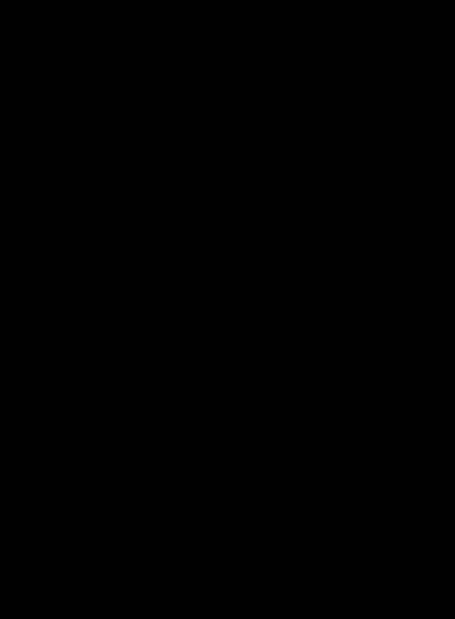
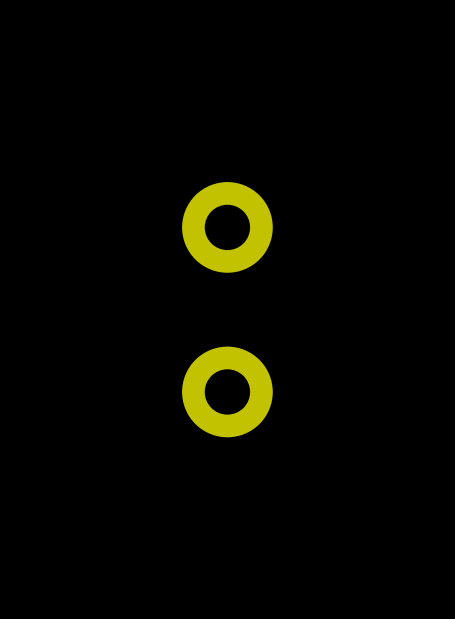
part: none -> (227, 309)

